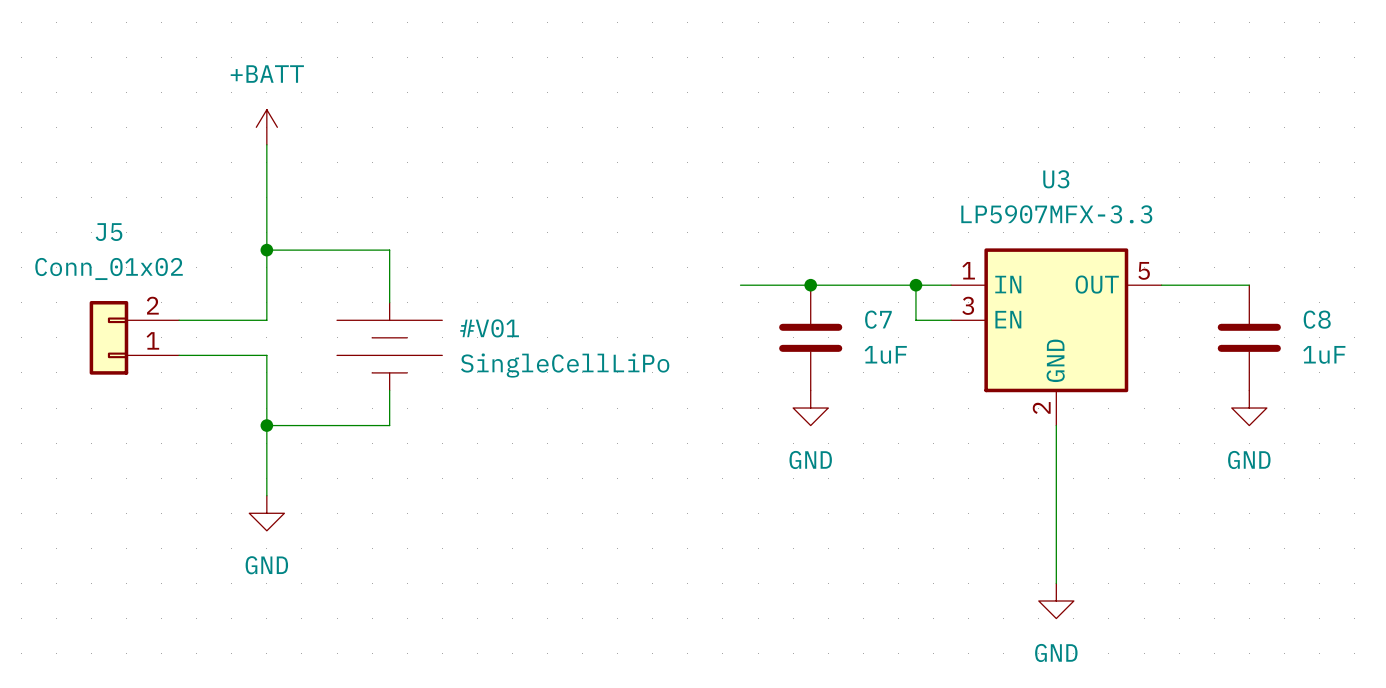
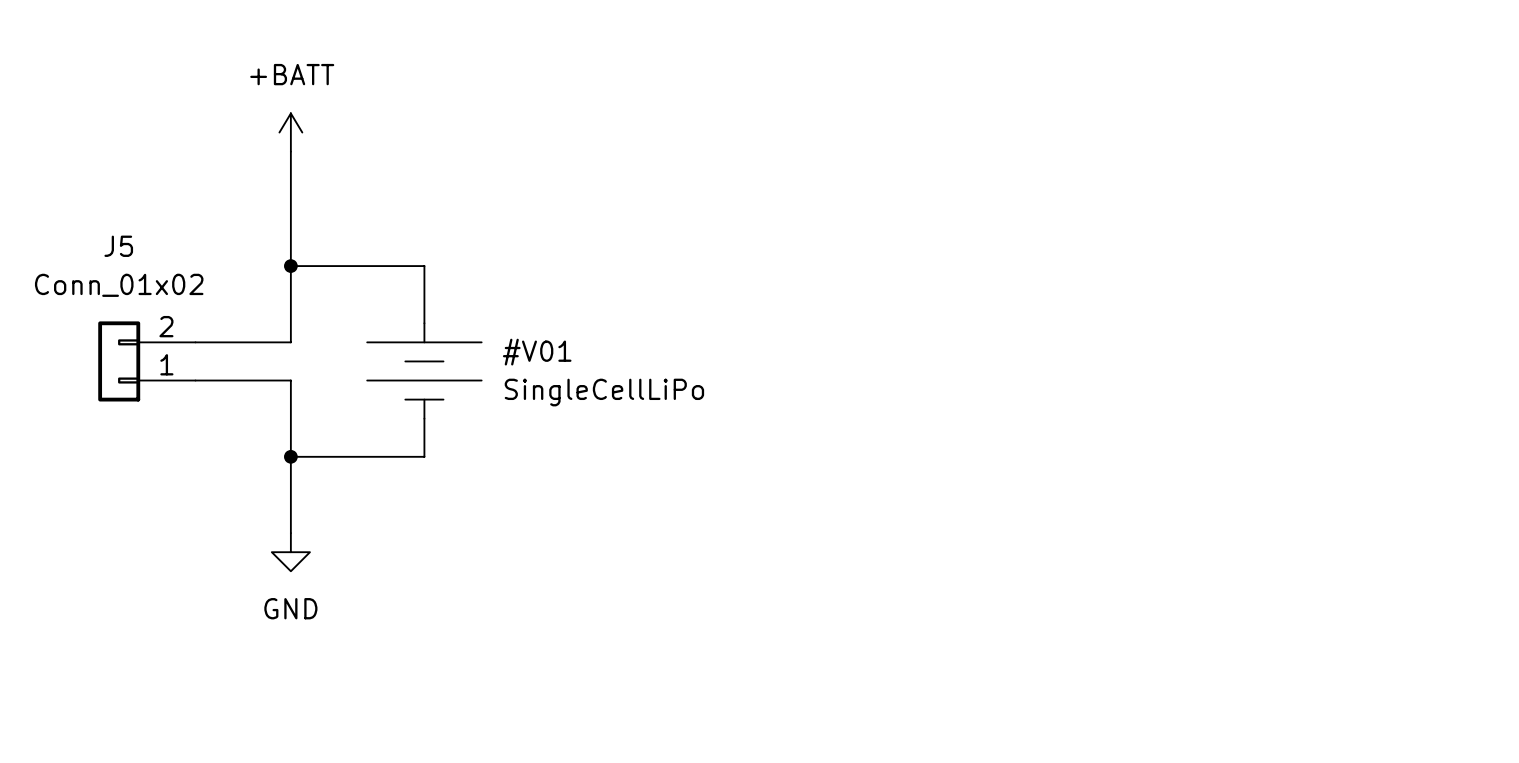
wire: (740, 285) (951, 285) -> none
junction: (810, 285) -> none
wire: (915, 285) (915, 320) (951, 320) -> none
junction: (915, 285) -> none
wire: (1161, 285) (1249, 285) -> none
U3: LP5907MFX-3.3 (1056, 336) -> none
C7: 1uF (810, 337) -> none
C8: 1uF (1249, 337) -> none
power symbol: GND (810, 408) -> none
power symbol: GND (1249, 408) -> none
wire: (1056, 425) (1056, 583) -> none
power symbol: GND (1056, 600) -> none

